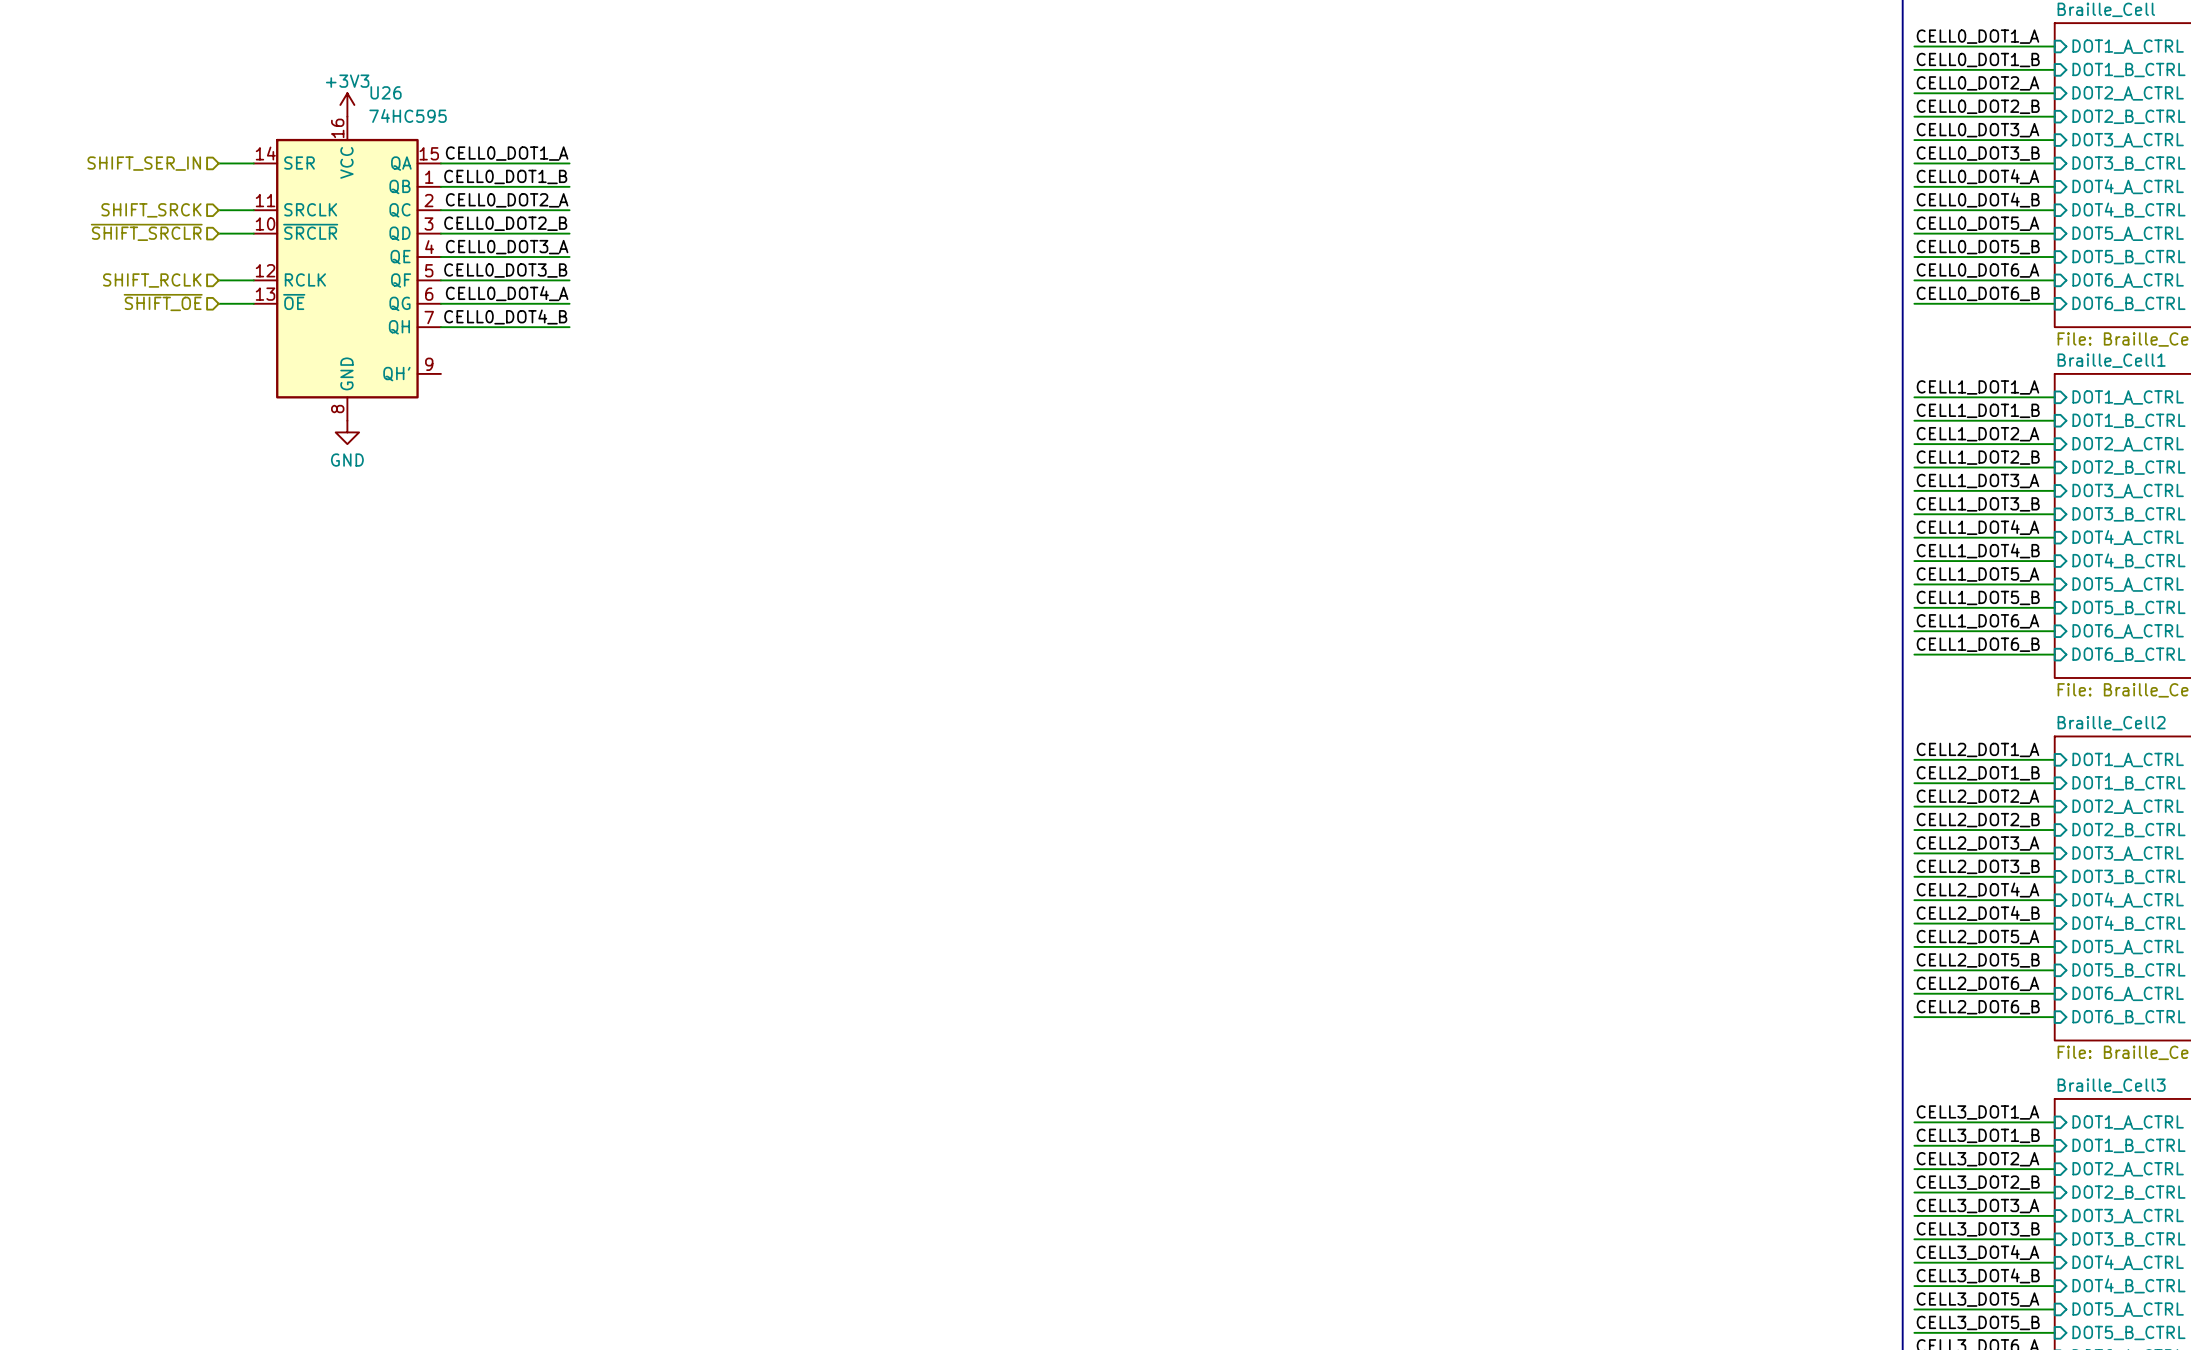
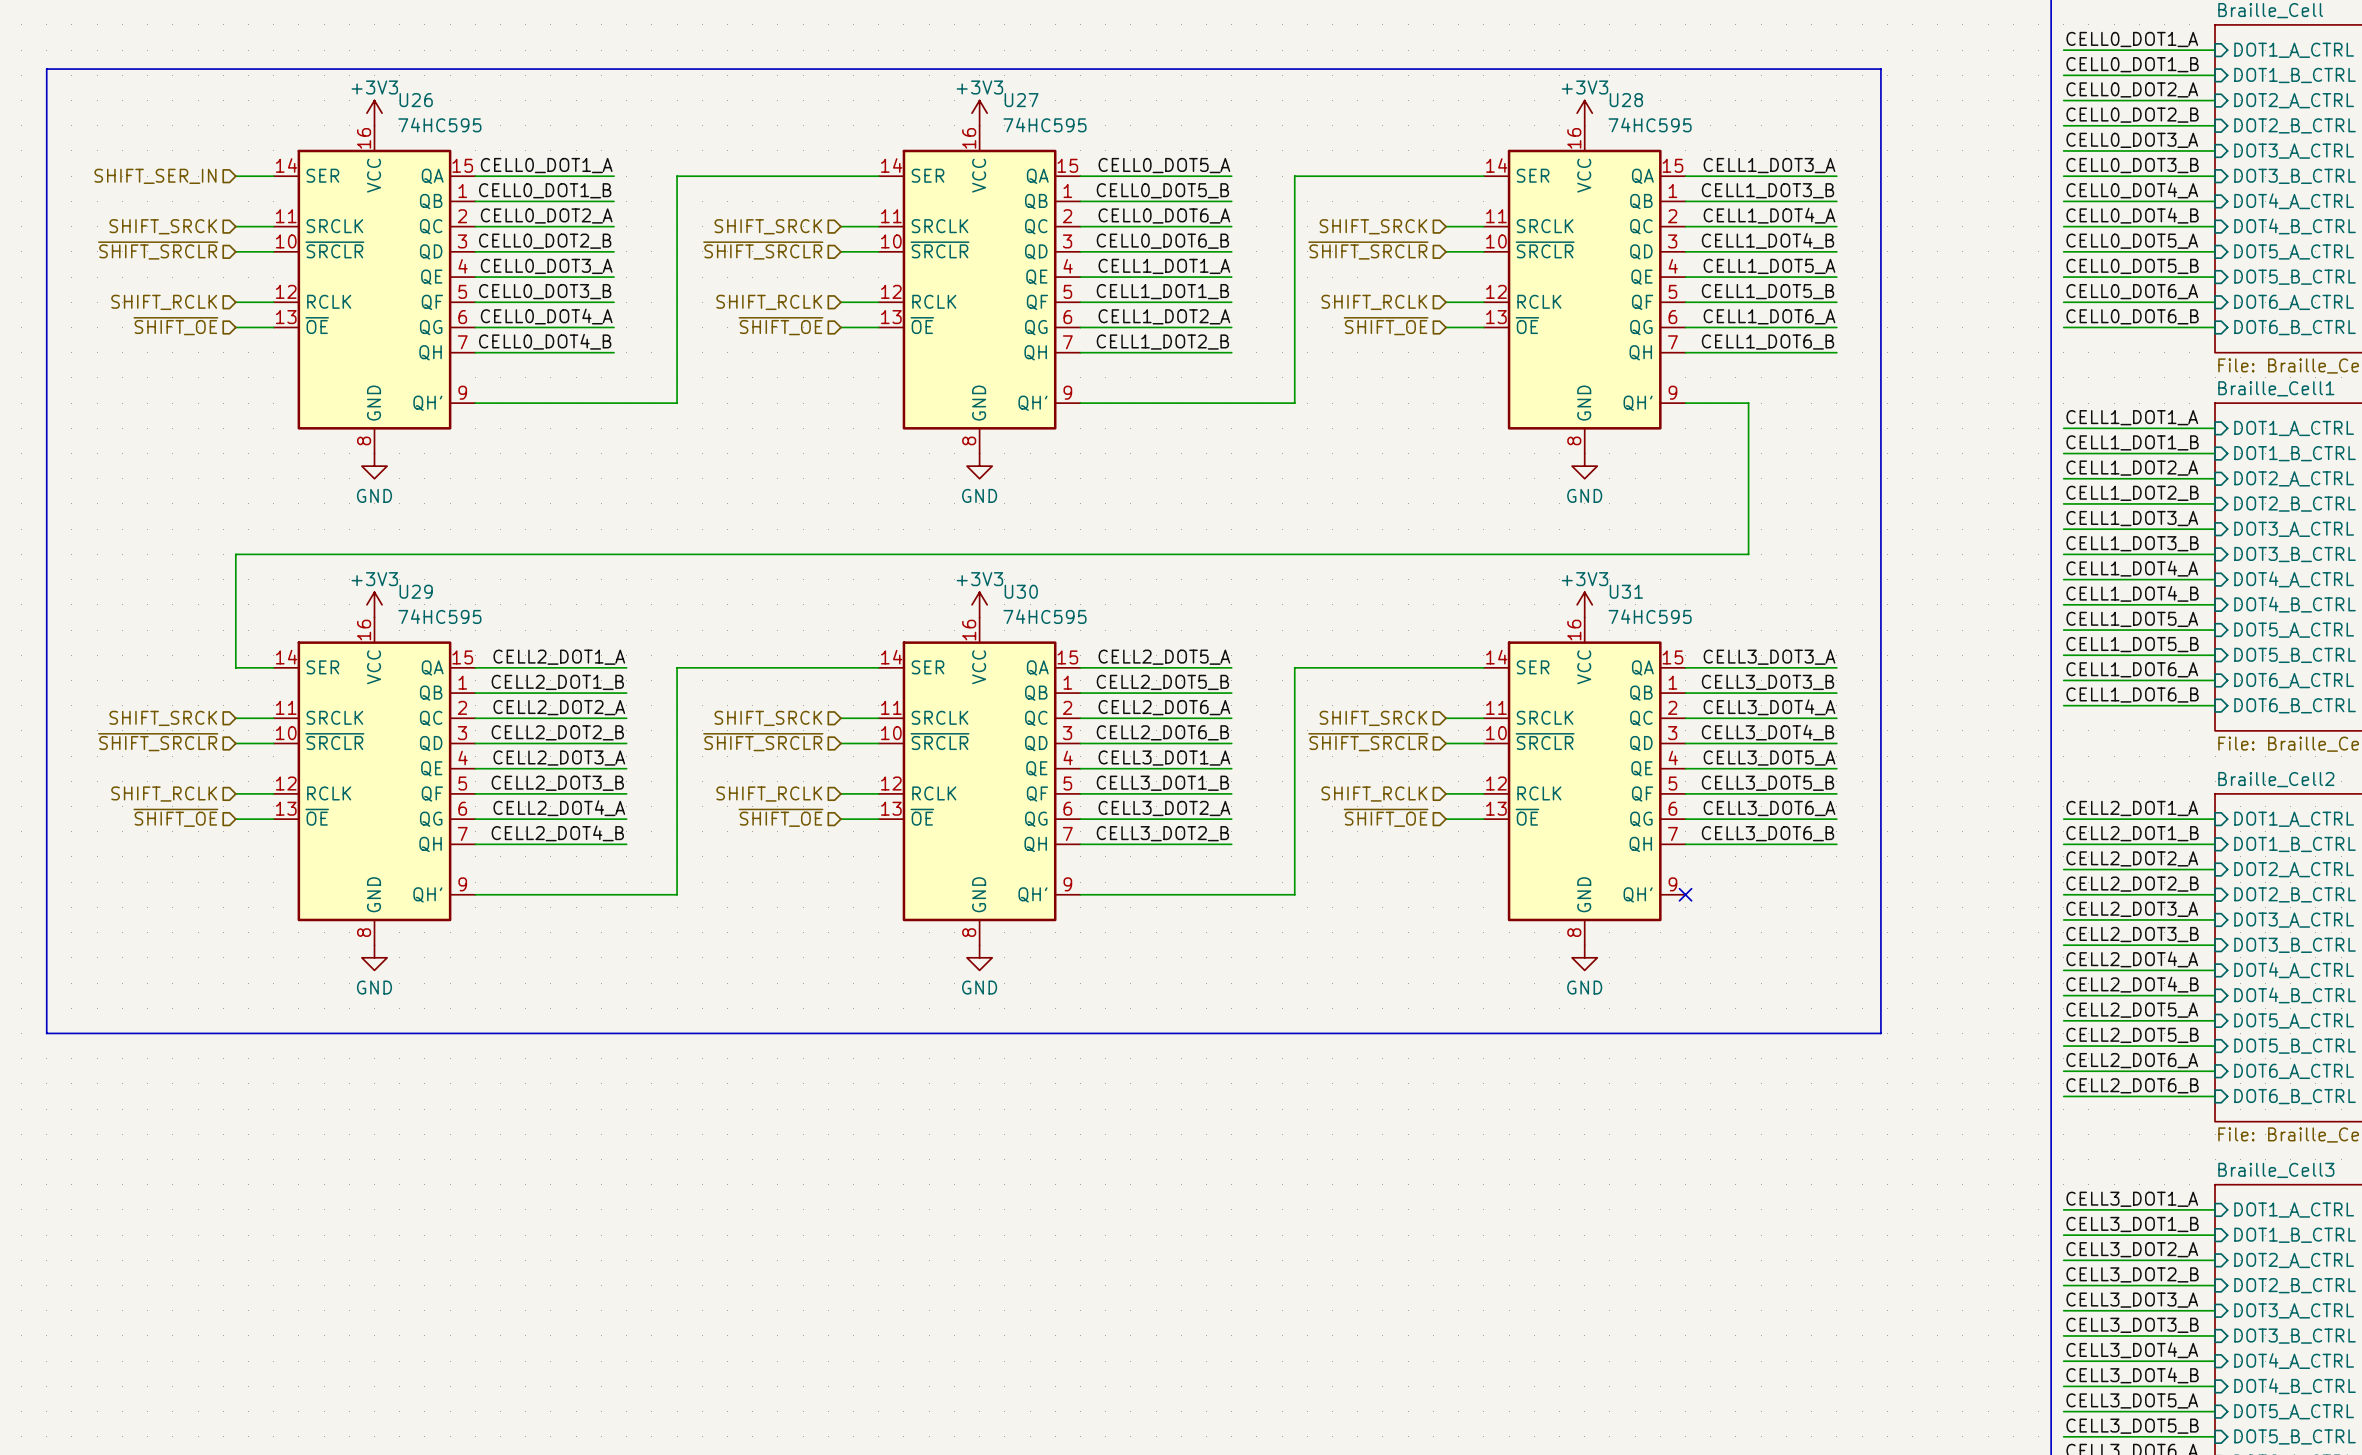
line: none -> (46, 69) (1880, 69) (1880, 1033) (46, 1033) (46, 69)
power symbol: none -> +3V3 (979, 113)
power symbol: none -> +3V3 (1584, 113)
label: none -> CELL0_DOT5_A (1164, 165)
label: none -> CELL1_DOT3_A (1769, 165)
wire: none -> (878, 176) (677, 176) (677, 403) (475, 403)
wire: none -> (1080, 176) (1231, 176)
wire: none -> (1483, 176) (1294, 176) (1294, 403) (1080, 403)
wire: none -> (1685, 176) (1836, 176)
label: none -> CELL0_DOT5_B (1162, 190)
label: none -> CELL1_DOT3_B (1767, 190)
wire: none -> (1080, 201) (1231, 201)
wire: none -> (1685, 201) (1836, 201)
label: none -> CELL0_DOT6_A (1164, 215)
label: none -> CELL1_DOT4_A (1769, 215)
hierarchical label: none -> SHIFT_SRCK (768, 226)
wire: none -> (840, 226) (878, 226)
wire: none -> (1080, 226) (1231, 226)
hierarchical label: none -> SHIFT_SRCK (1373, 226)
wire: none -> (1446, 226) (1483, 226)
wire: none -> (1685, 226) (1836, 226)
label: none -> CELL0_DOT6_B (1162, 241)
label: none -> CELL1_DOT4_B (1767, 240)
hierarchical label: none -> ~{SHIFT_SRCLR} (763, 250)
hierarchical label: none -> ~{SHIFT_SRCLR} (1368, 250)
wire: none -> (840, 251) (878, 251)
wire: none -> (1080, 251) (1231, 251)
wire: none -> (1446, 251) (1483, 251)
wire: none -> (1685, 251) (1836, 251)
label: none -> CELL1_DOT1_A (1164, 266)
label: none -> CELL1_DOT5_A (1769, 266)
wire: none -> (1080, 277) (1231, 277)
wire: none -> (1685, 277) (1836, 277)
U27: none -> 74HC595 (979, 289)
U28: none -> 74HC595 (1584, 289)
label: none -> CELL1_DOT1_B (1162, 291)
label: none -> CELL1_DOT5_B (1767, 291)
hierarchical label: none -> SHIFT_RCLK (769, 302)
wire: none -> (840, 302) (878, 302)
wire: none -> (1080, 302) (1231, 302)
hierarchical label: none -> SHIFT_RCLK (1374, 302)
wire: none -> (1446, 302) (1483, 302)
wire: none -> (1685, 302) (1836, 302)
label: none -> CELL1_DOT2_A (1164, 316)
label: none -> CELL1_DOT6_A (1769, 316)
hierarchical label: none -> ~{SHIFT_OE} (780, 326)
hierarchical label: none -> ~{SHIFT_OE} (1386, 326)
wire: none -> (840, 327) (878, 327)
wire: none -> (1080, 327) (1231, 327)
wire: none -> (1446, 327) (1483, 327)
wire: none -> (1685, 327) (1836, 327)
label: none -> CELL1_DOT2_B (1162, 342)
label: none -> CELL1_DOT6_B (1767, 342)
wire: none -> (1080, 352) (1231, 352)
wire: none -> (1685, 352) (1836, 352)
wire: none -> (1685, 403) (1748, 403) (1748, 554) (235, 554) (235, 667) (273, 667)
power symbol: none -> GND (979, 466)
power symbol: none -> GND (1584, 466)
power symbol: none -> +3V3 (374, 604)
power symbol: none -> +3V3 (979, 604)
power symbol: none -> +3V3 (1584, 604)
label: none -> CELL2_DOT1_A (559, 657)
label: none -> CELL2_DOT5_A (1164, 657)
label: none -> CELL3_DOT3_A (1769, 657)
wire: none -> (475, 667) (626, 667)
wire: none -> (878, 667) (677, 667) (677, 894) (475, 894)
wire: none -> (1080, 667) (1231, 667)
wire: none -> (1483, 667) (1294, 667) (1294, 894) (1080, 894)
wire: none -> (1685, 667) (1836, 667)
label: none -> CELL2_DOT1_B (557, 682)
label: none -> CELL2_DOT5_B (1162, 682)
label: none -> CELL3_DOT3_B (1767, 682)
wire: none -> (475, 693) (626, 693)
wire: none -> (1080, 693) (1231, 693)
wire: none -> (1685, 693) (1836, 693)
label: none -> CELL2_DOT2_A (559, 707)
label: none -> CELL2_DOT6_A (1164, 707)
label: none -> CELL3_DOT4_A (1769, 707)
hierarchical label: none -> SHIFT_SRCK (163, 718)
wire: none -> (235, 718) (273, 718)
wire: none -> (475, 718) (626, 718)
hierarchical label: none -> SHIFT_SRCK (768, 718)
wire: none -> (840, 718) (878, 718)
wire: none -> (1080, 718) (1231, 718)
hierarchical label: none -> SHIFT_SRCK (1373, 718)
wire: none -> (1446, 718) (1483, 718)
wire: none -> (1685, 718) (1836, 718)
label: none -> CELL2_DOT2_B (557, 732)
label: none -> CELL2_DOT6_B (1162, 732)
label: none -> CELL3_DOT4_B (1767, 732)
hierarchical label: none -> ~{SHIFT_SRCLR} (158, 742)
hierarchical label: none -> ~{SHIFT_SRCLR} (763, 742)
hierarchical label: none -> ~{SHIFT_SRCLR} (1368, 742)
wire: none -> (235, 743) (273, 743)
wire: none -> (475, 743) (626, 743)
wire: none -> (840, 743) (878, 743)
wire: none -> (1080, 743) (1231, 743)
wire: none -> (1446, 743) (1483, 743)
wire: none -> (1685, 743) (1836, 743)
label: none -> CELL2_DOT3_A (559, 758)
label: none -> CELL3_DOT1_A (1164, 758)
label: none -> CELL3_DOT5_A (1769, 758)
wire: none -> (475, 768) (626, 768)
wire: none -> (1080, 768) (1231, 768)
wire: none -> (1685, 768) (1836, 768)
U29: none -> 74HC595 (374, 781)
U30: none -> 74HC595 (979, 781)
U31: none -> 74HC595 (1584, 781)
label: none -> CELL2_DOT3_B (557, 783)
label: none -> CELL3_DOT1_B (1162, 783)
label: none -> CELL3_DOT5_B (1767, 783)
hierarchical label: none -> SHIFT_RCLK (164, 794)
wire: none -> (235, 793) (273, 793)
wire: none -> (475, 793) (626, 793)
hierarchical label: none -> SHIFT_RCLK (769, 794)
wire: none -> (840, 793) (878, 793)
wire: none -> (1080, 793) (1231, 793)
hierarchical label: none -> SHIFT_RCLK (1374, 794)
wire: none -> (1446, 793) (1483, 793)
wire: none -> (1685, 793) (1836, 793)
label: none -> CELL2_DOT4_A (559, 808)
label: none -> CELL3_DOT2_A (1164, 808)
label: none -> CELL3_DOT6_A (1769, 808)
hierarchical label: none -> ~{SHIFT_OE} (175, 817)
hierarchical label: none -> ~{SHIFT_OE} (780, 817)
hierarchical label: none -> ~{SHIFT_OE} (1386, 817)
wire: none -> (235, 819) (273, 819)
wire: none -> (475, 819) (626, 819)
wire: none -> (840, 819) (878, 819)
wire: none -> (1080, 819) (1231, 819)
wire: none -> (1446, 819) (1483, 819)
wire: none -> (1685, 819) (1836, 819)
label: none -> CELL2_DOT4_B (557, 833)
label: none -> CELL3_DOT2_B (1162, 833)
label: none -> CELL3_DOT6_B (1767, 833)
wire: none -> (475, 844) (626, 844)
wire: none -> (1080, 844) (1231, 844)
wire: none -> (1685, 844) (1836, 844)
no-connect mark: none -> (1685, 894)
power symbol: none -> GND (374, 957)
power symbol: none -> GND (979, 957)
power symbol: none -> GND (1584, 957)

